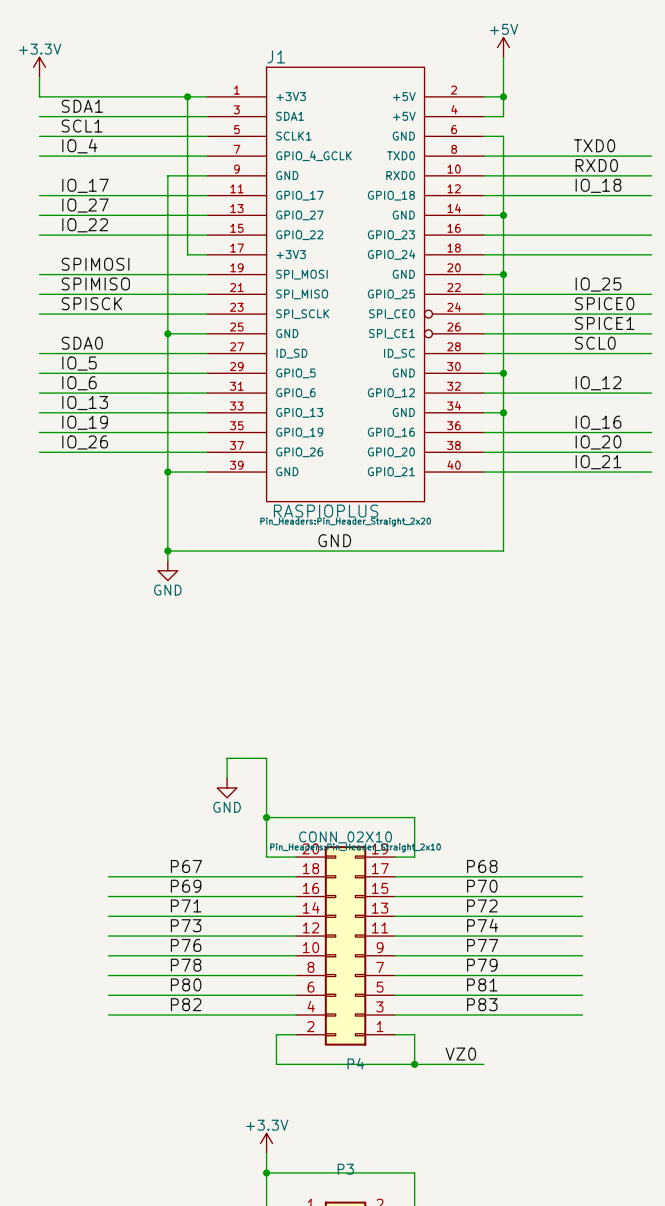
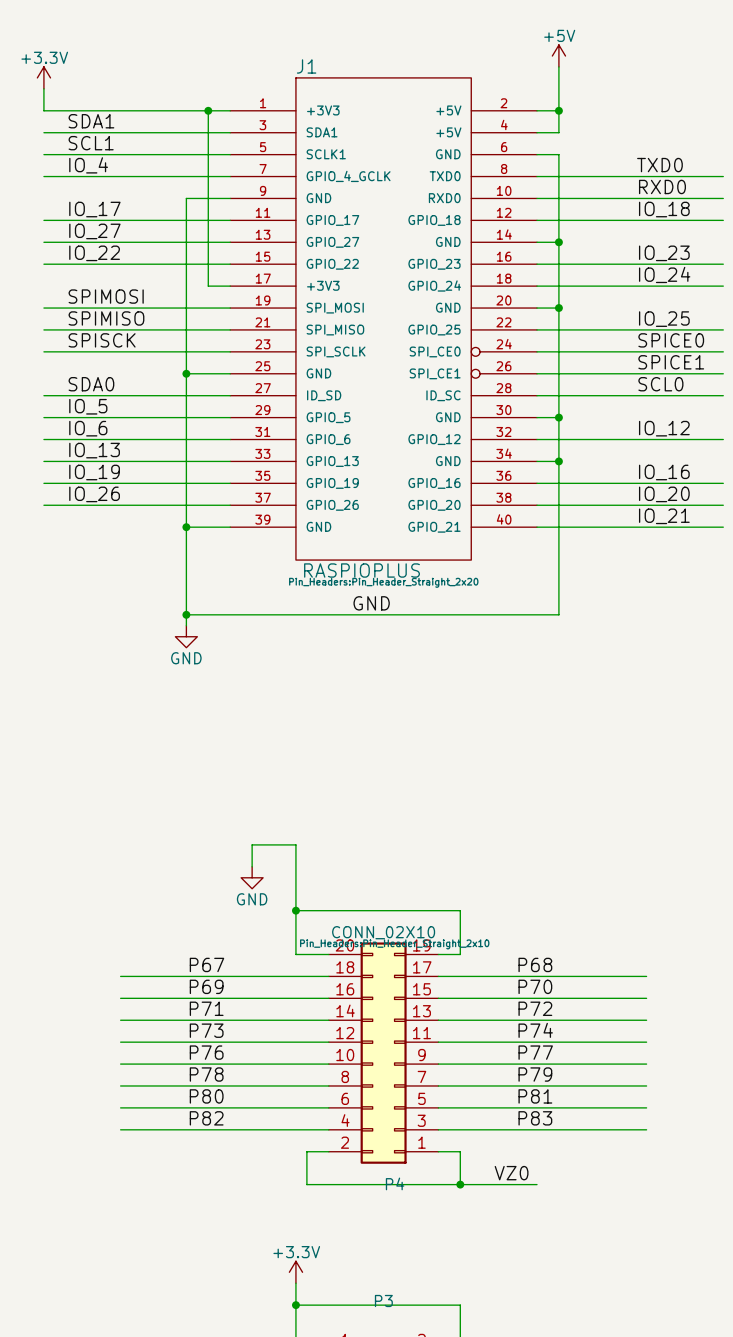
label: none -> IO_23 (664, 253)
label: none -> IO_24 (664, 274)

